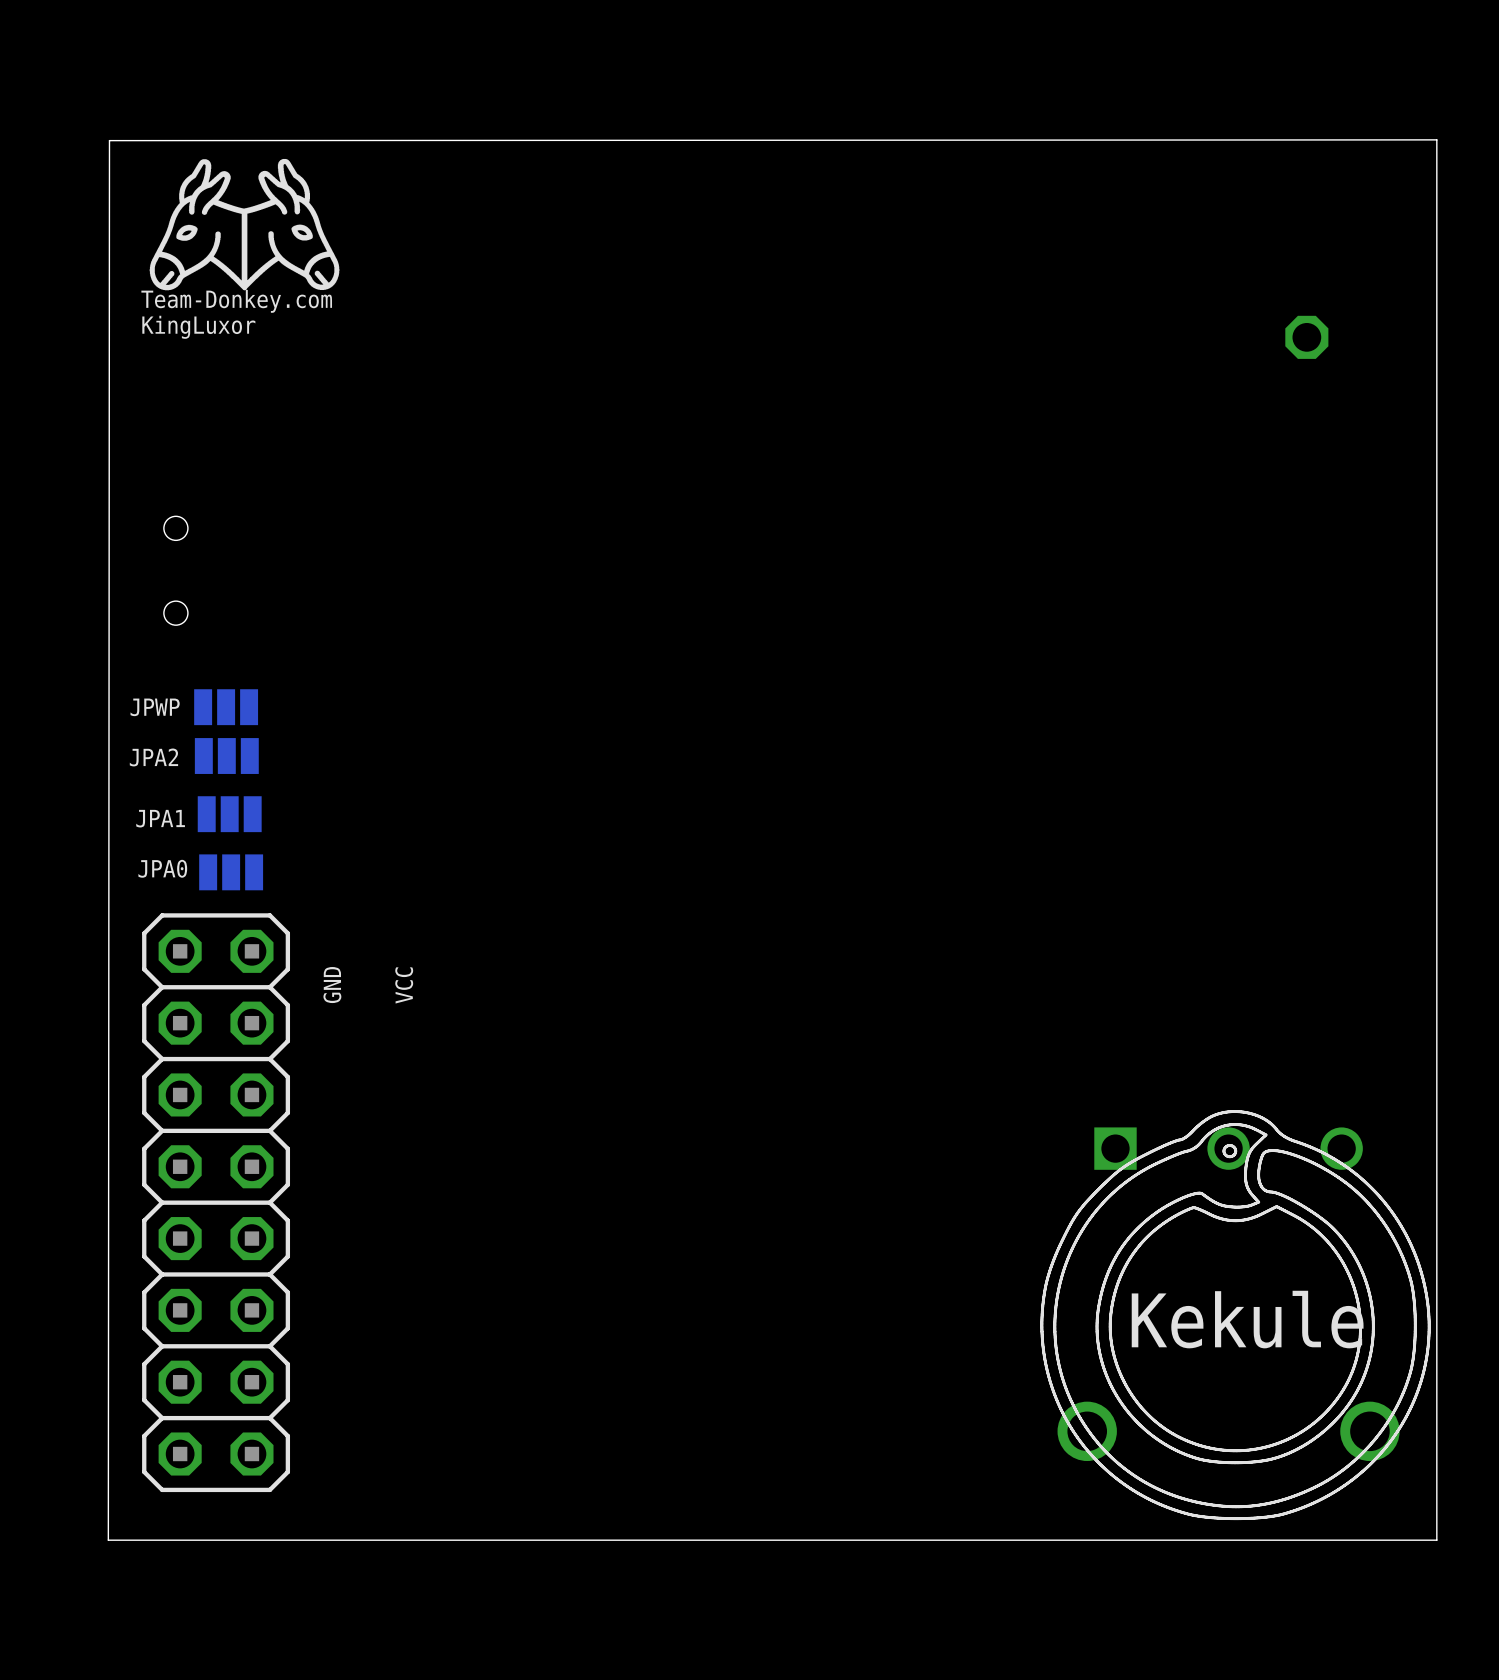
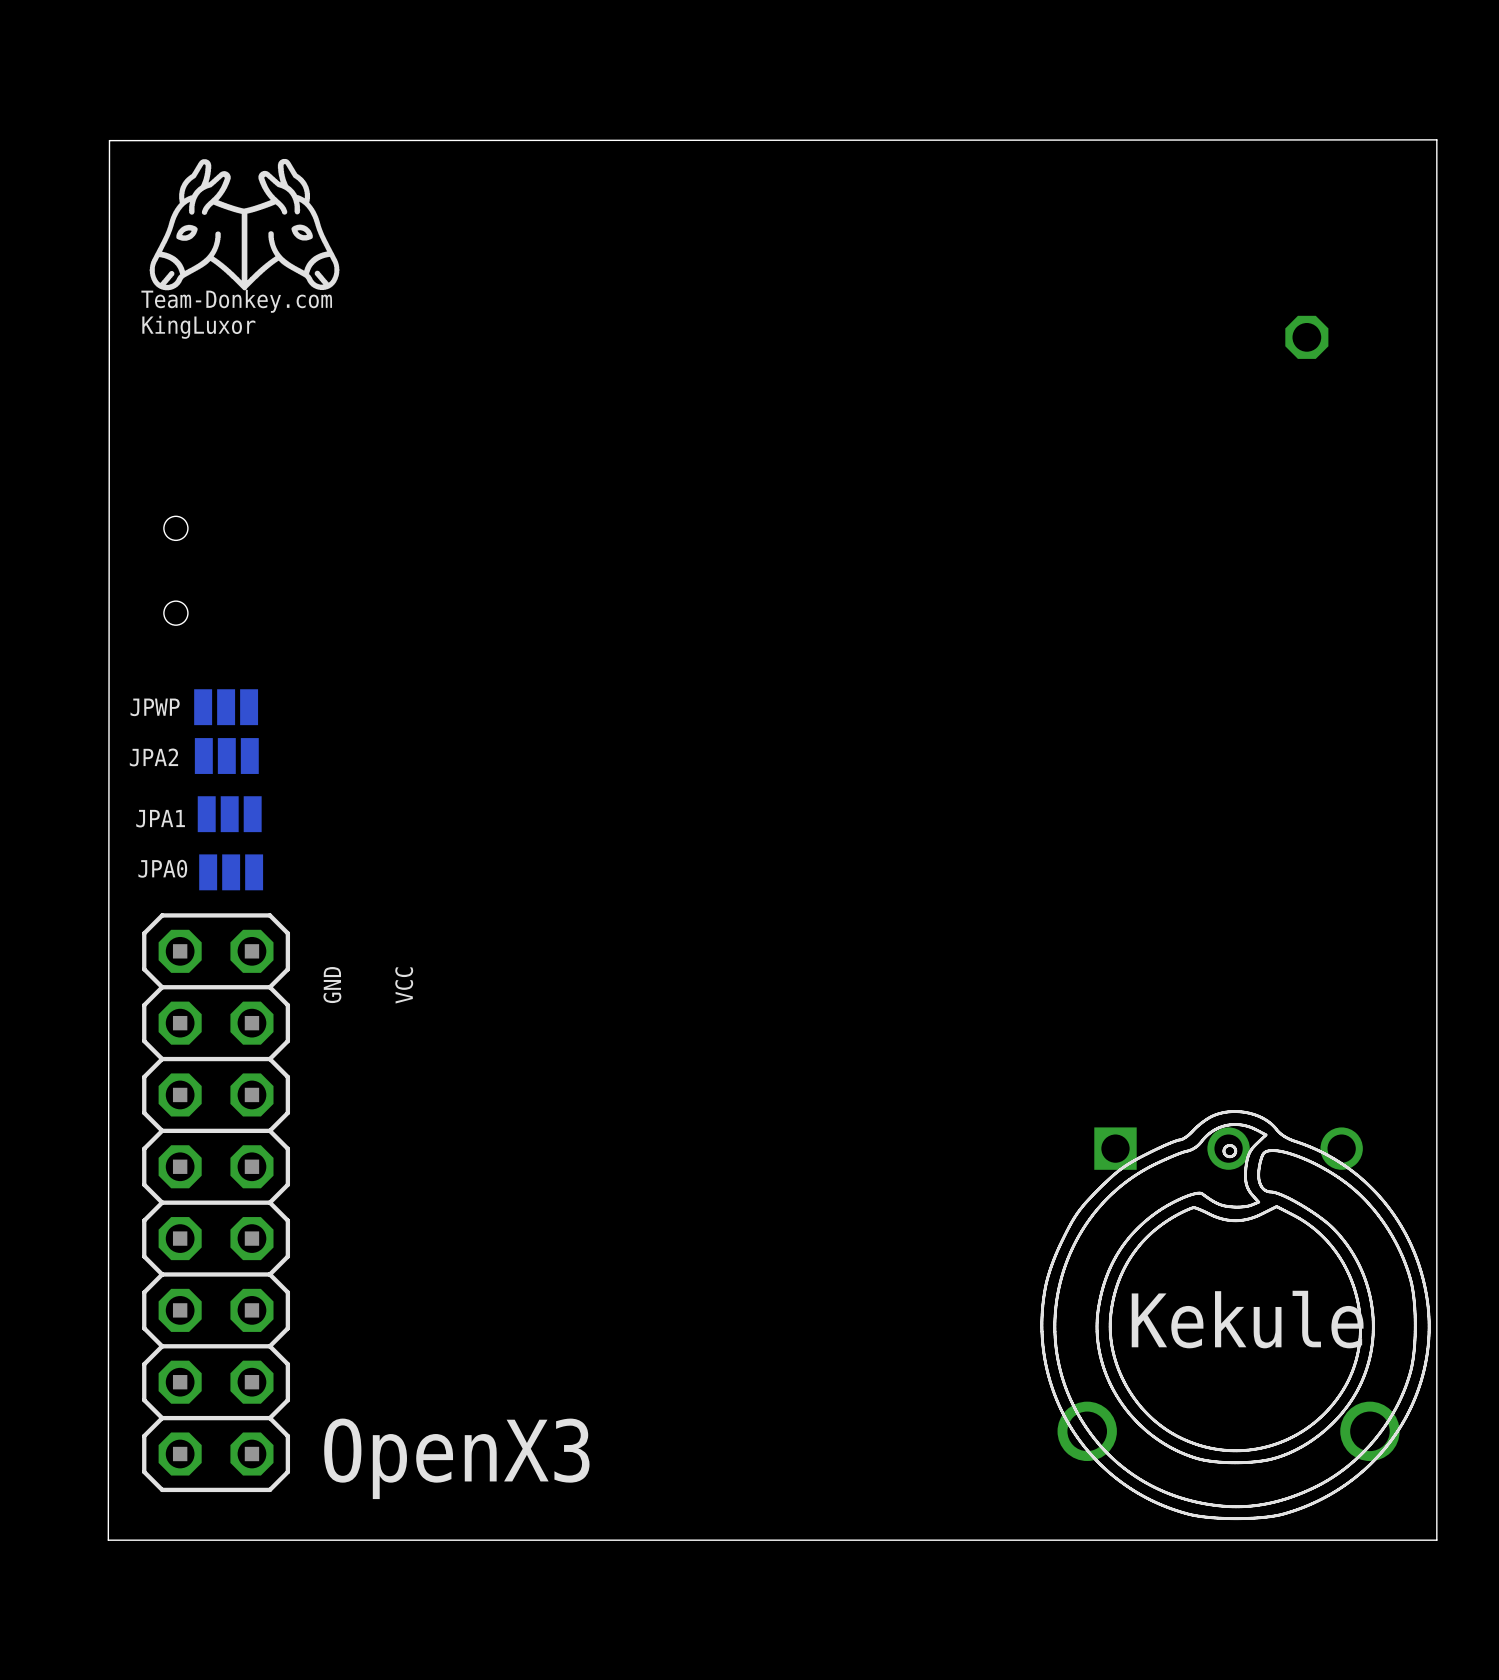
text: none -> OpenX3 (456, 1458)

